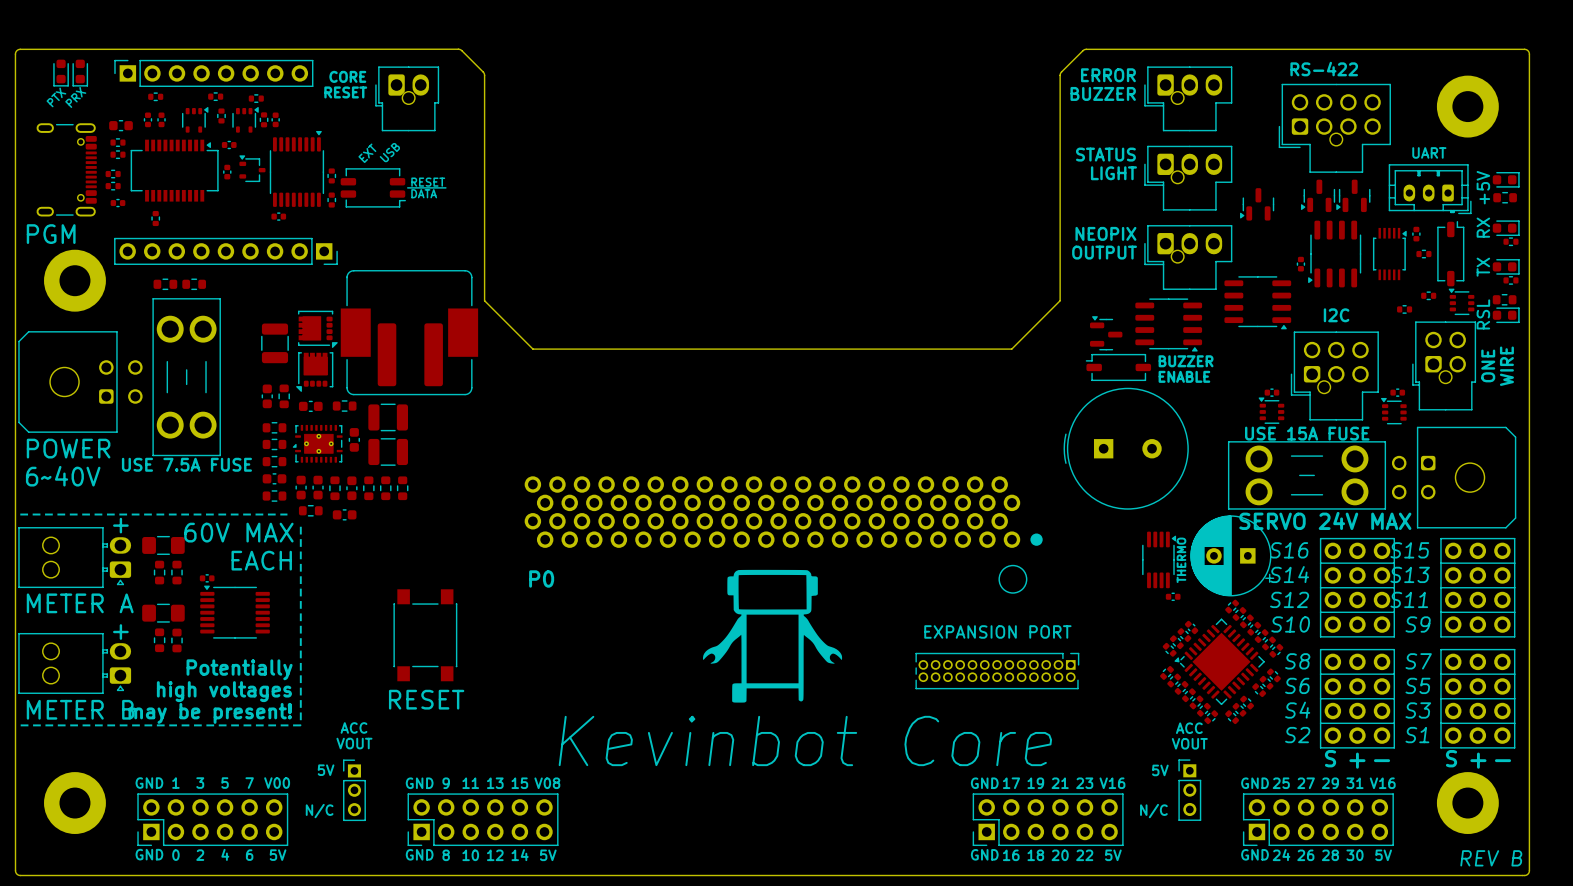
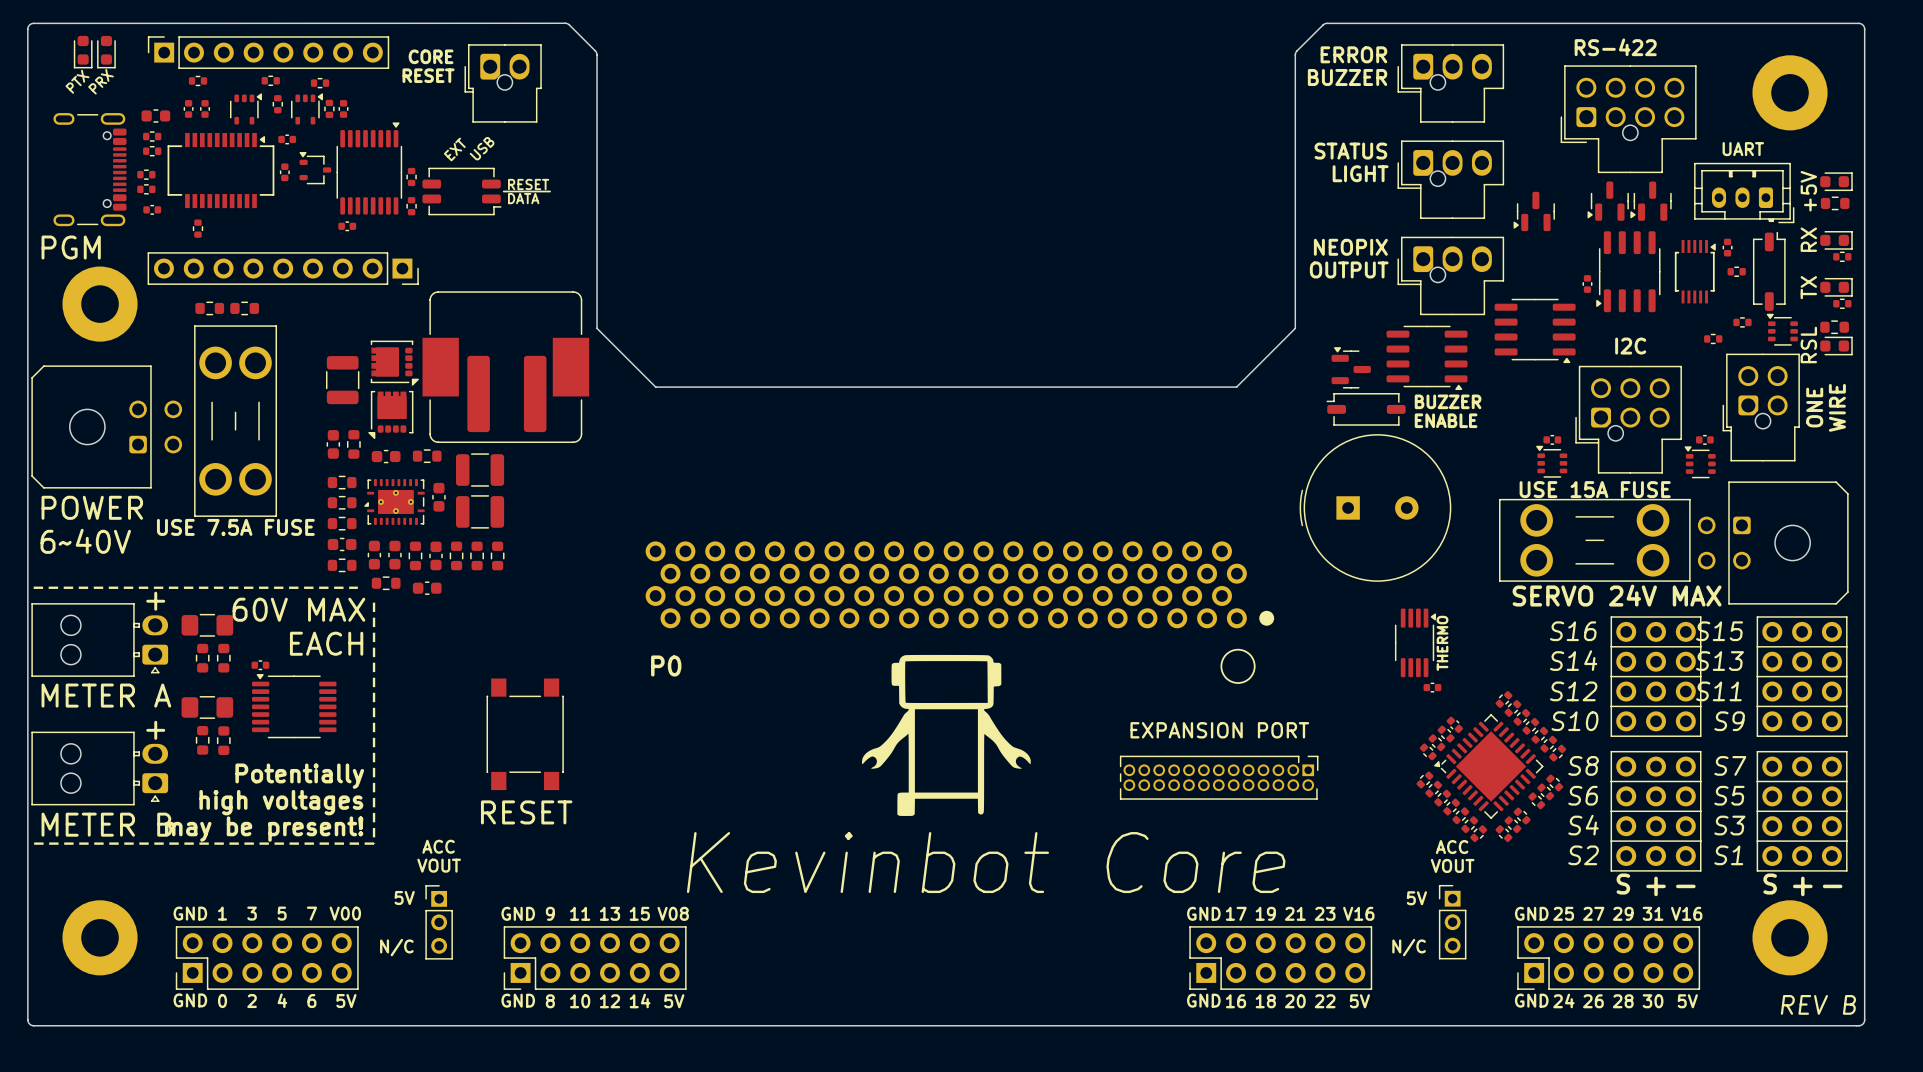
part: (1232, 555) -> none

